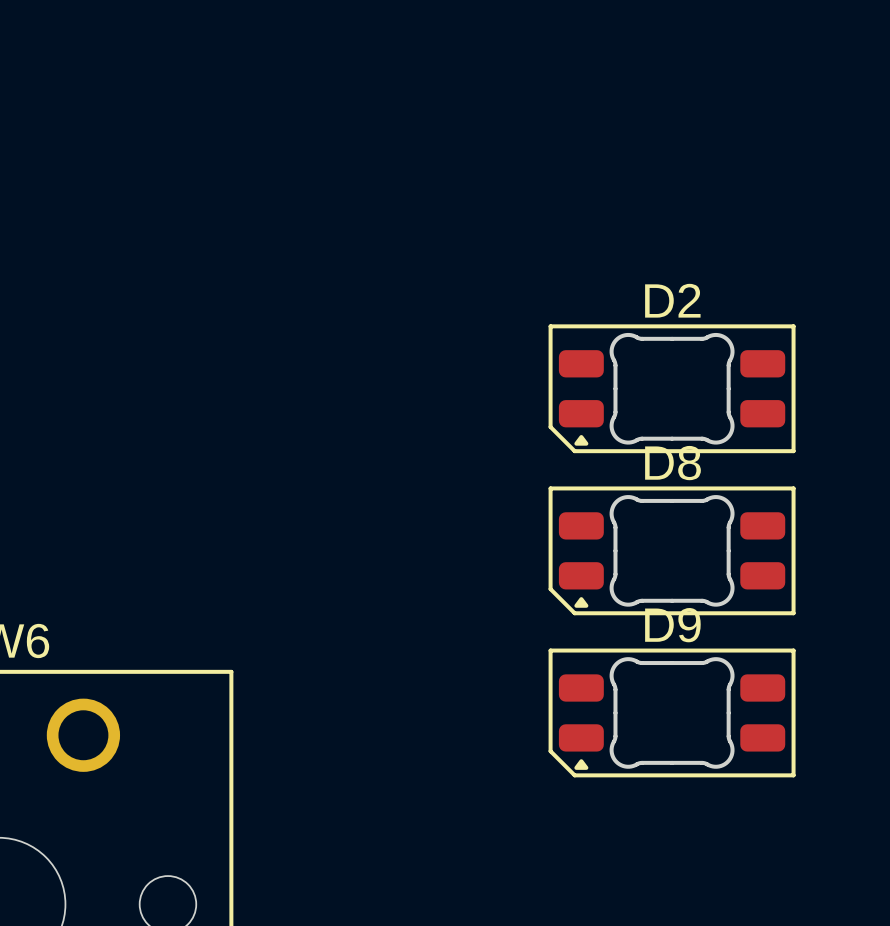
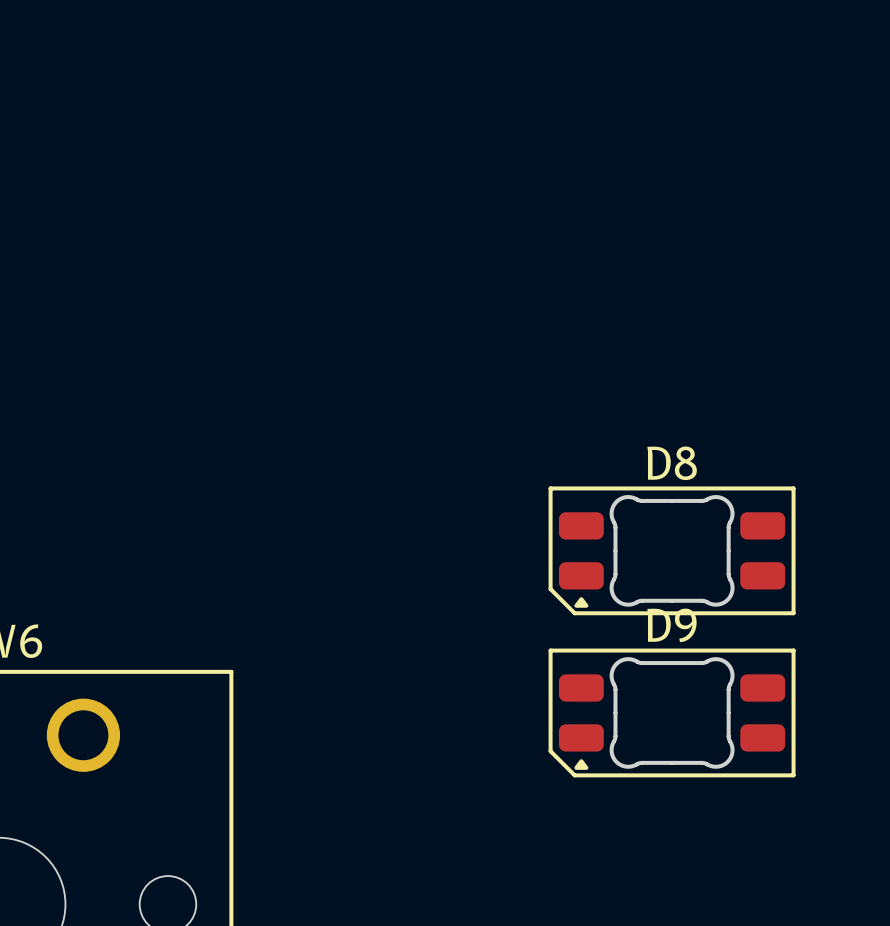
D2: (672, 388) -> none

